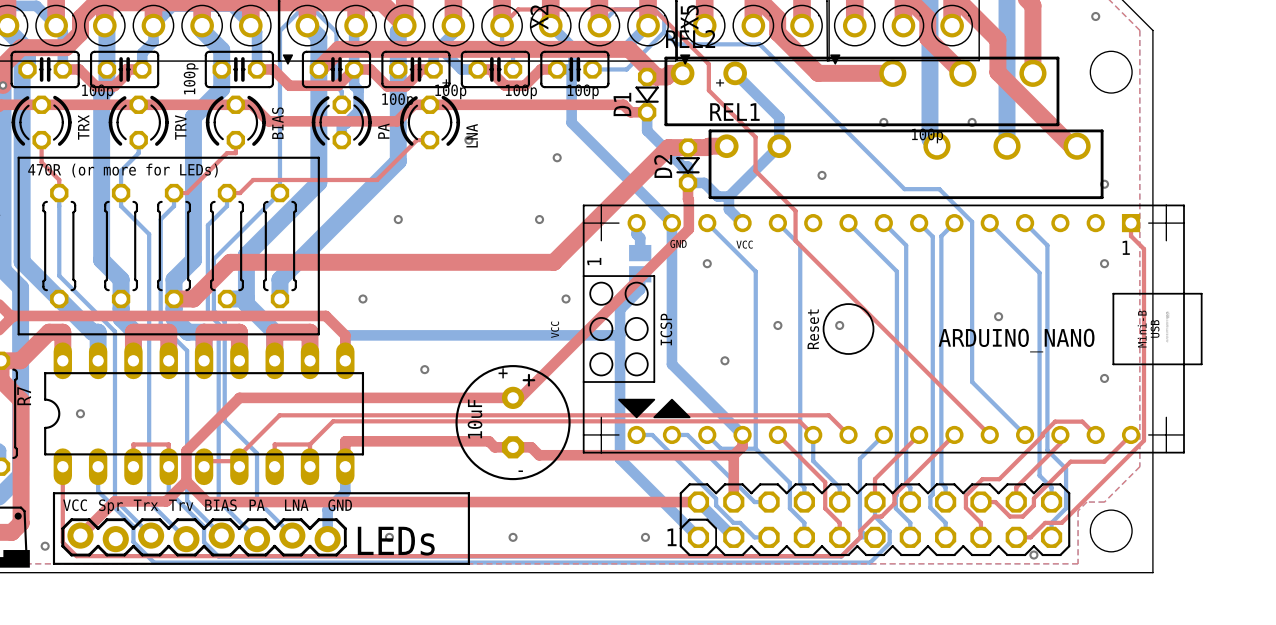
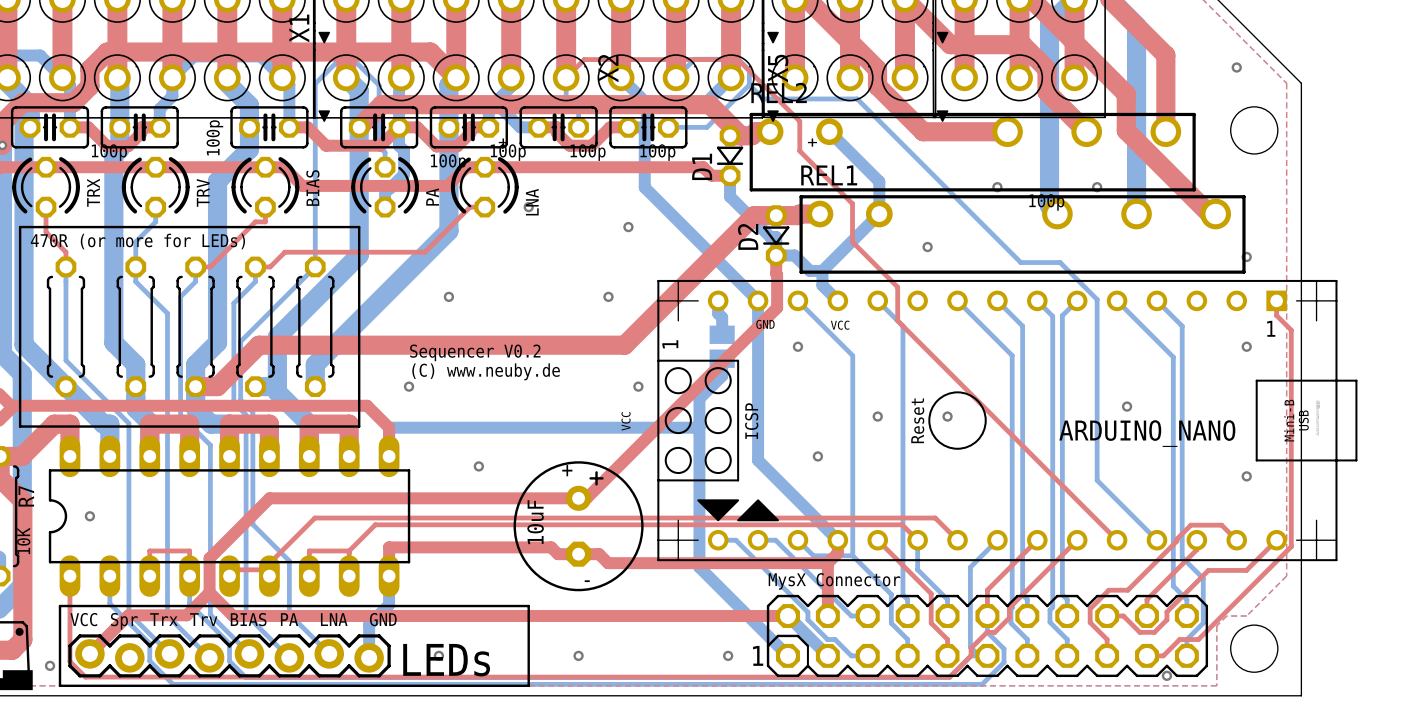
text: none -> Sequencer V0.2 (475, 352)
text: none -> (C) www.neuby.de (486, 371)
text: none -> 10K (23, 541)
text: none -> MysX Connector (834, 581)

